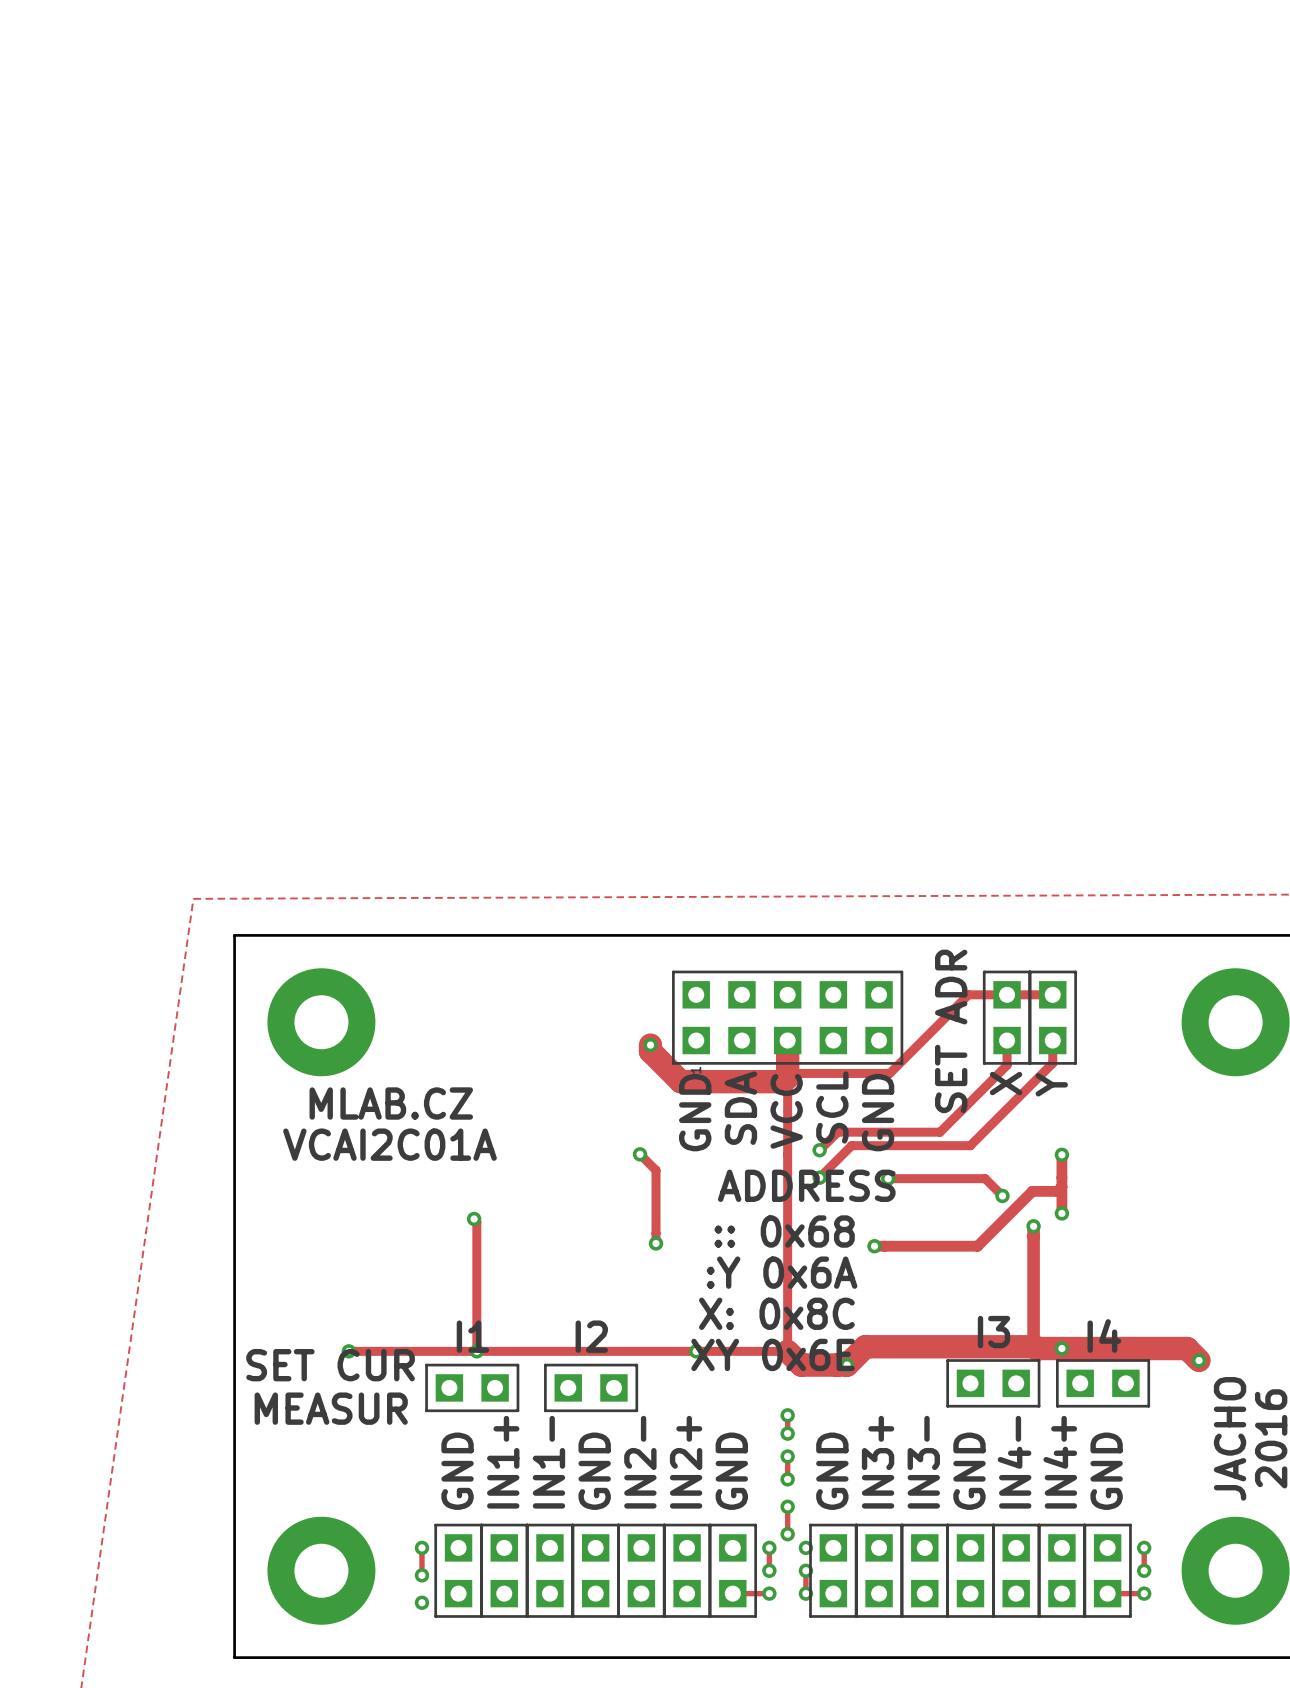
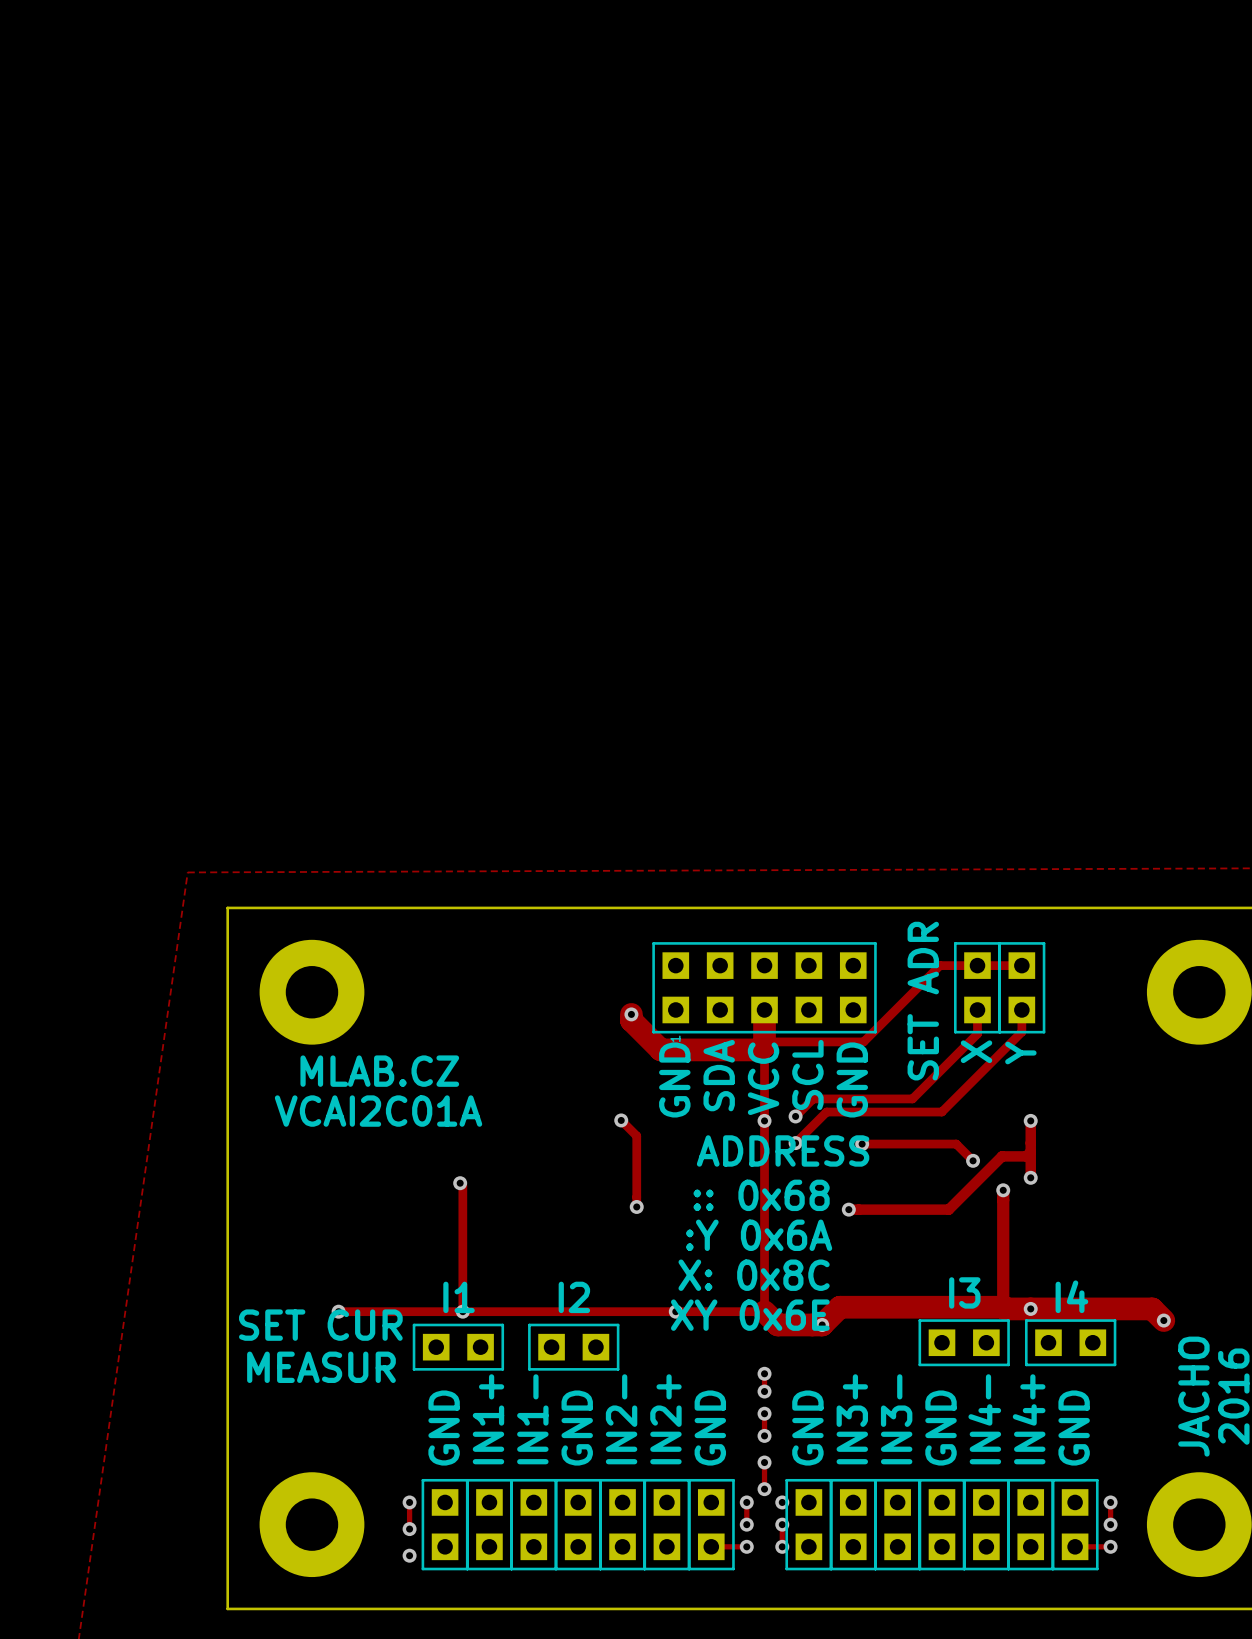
via: none -> (764, 1120)

